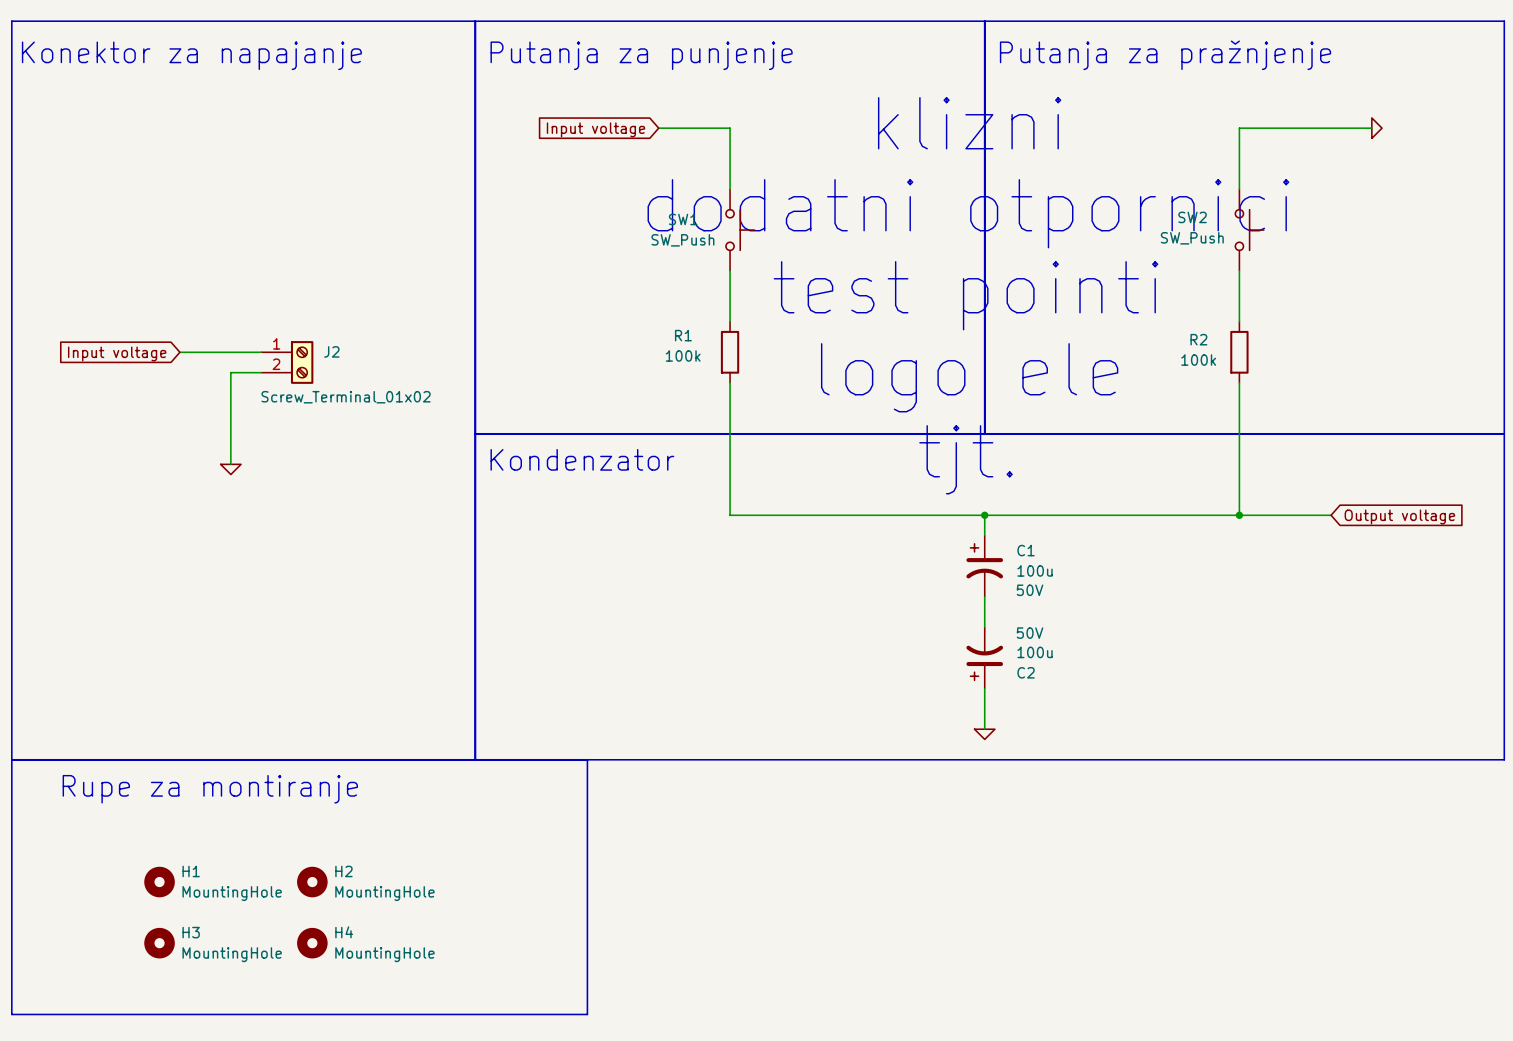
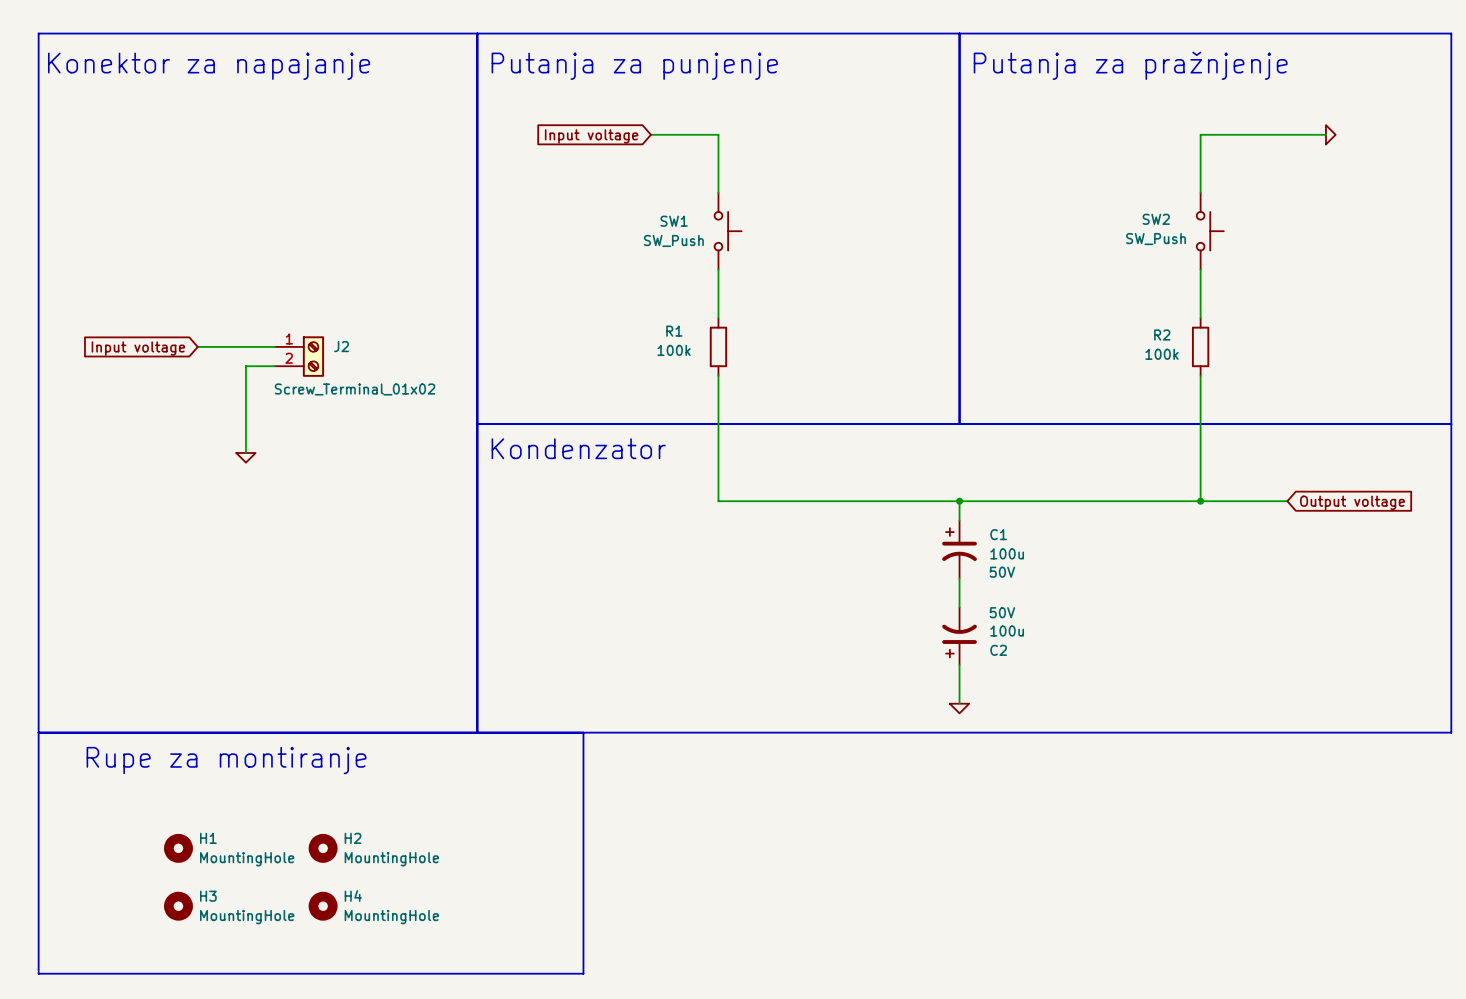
text: klizni (969, 123) -> none
text: dodatni otpornici (968, 213) -> none
text: test pointi (966, 295) -> none
text: logo ele (969, 377) -> none
text: tjt. (966, 459) -> none

